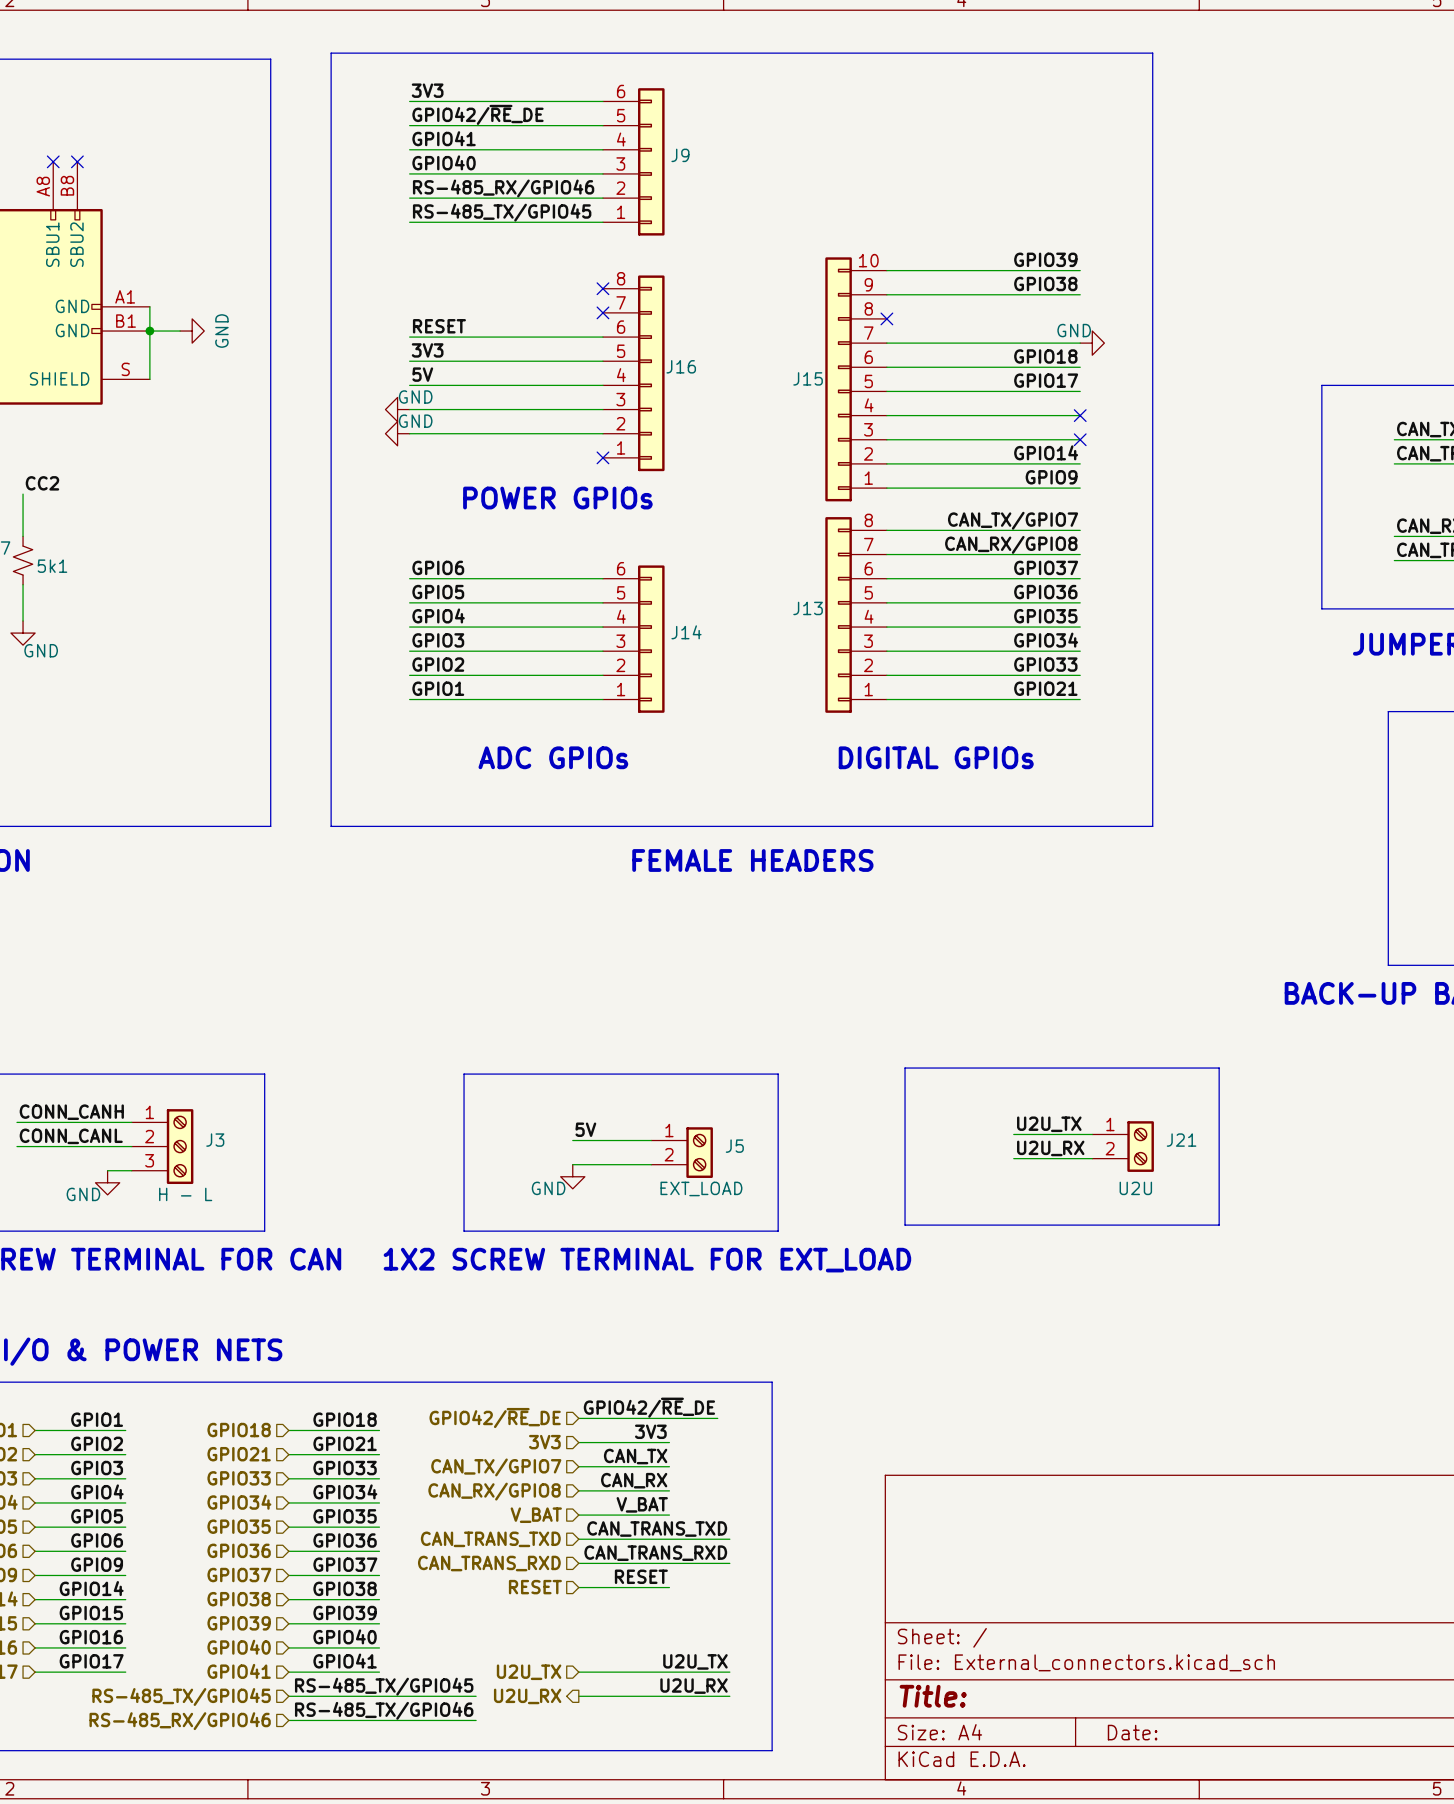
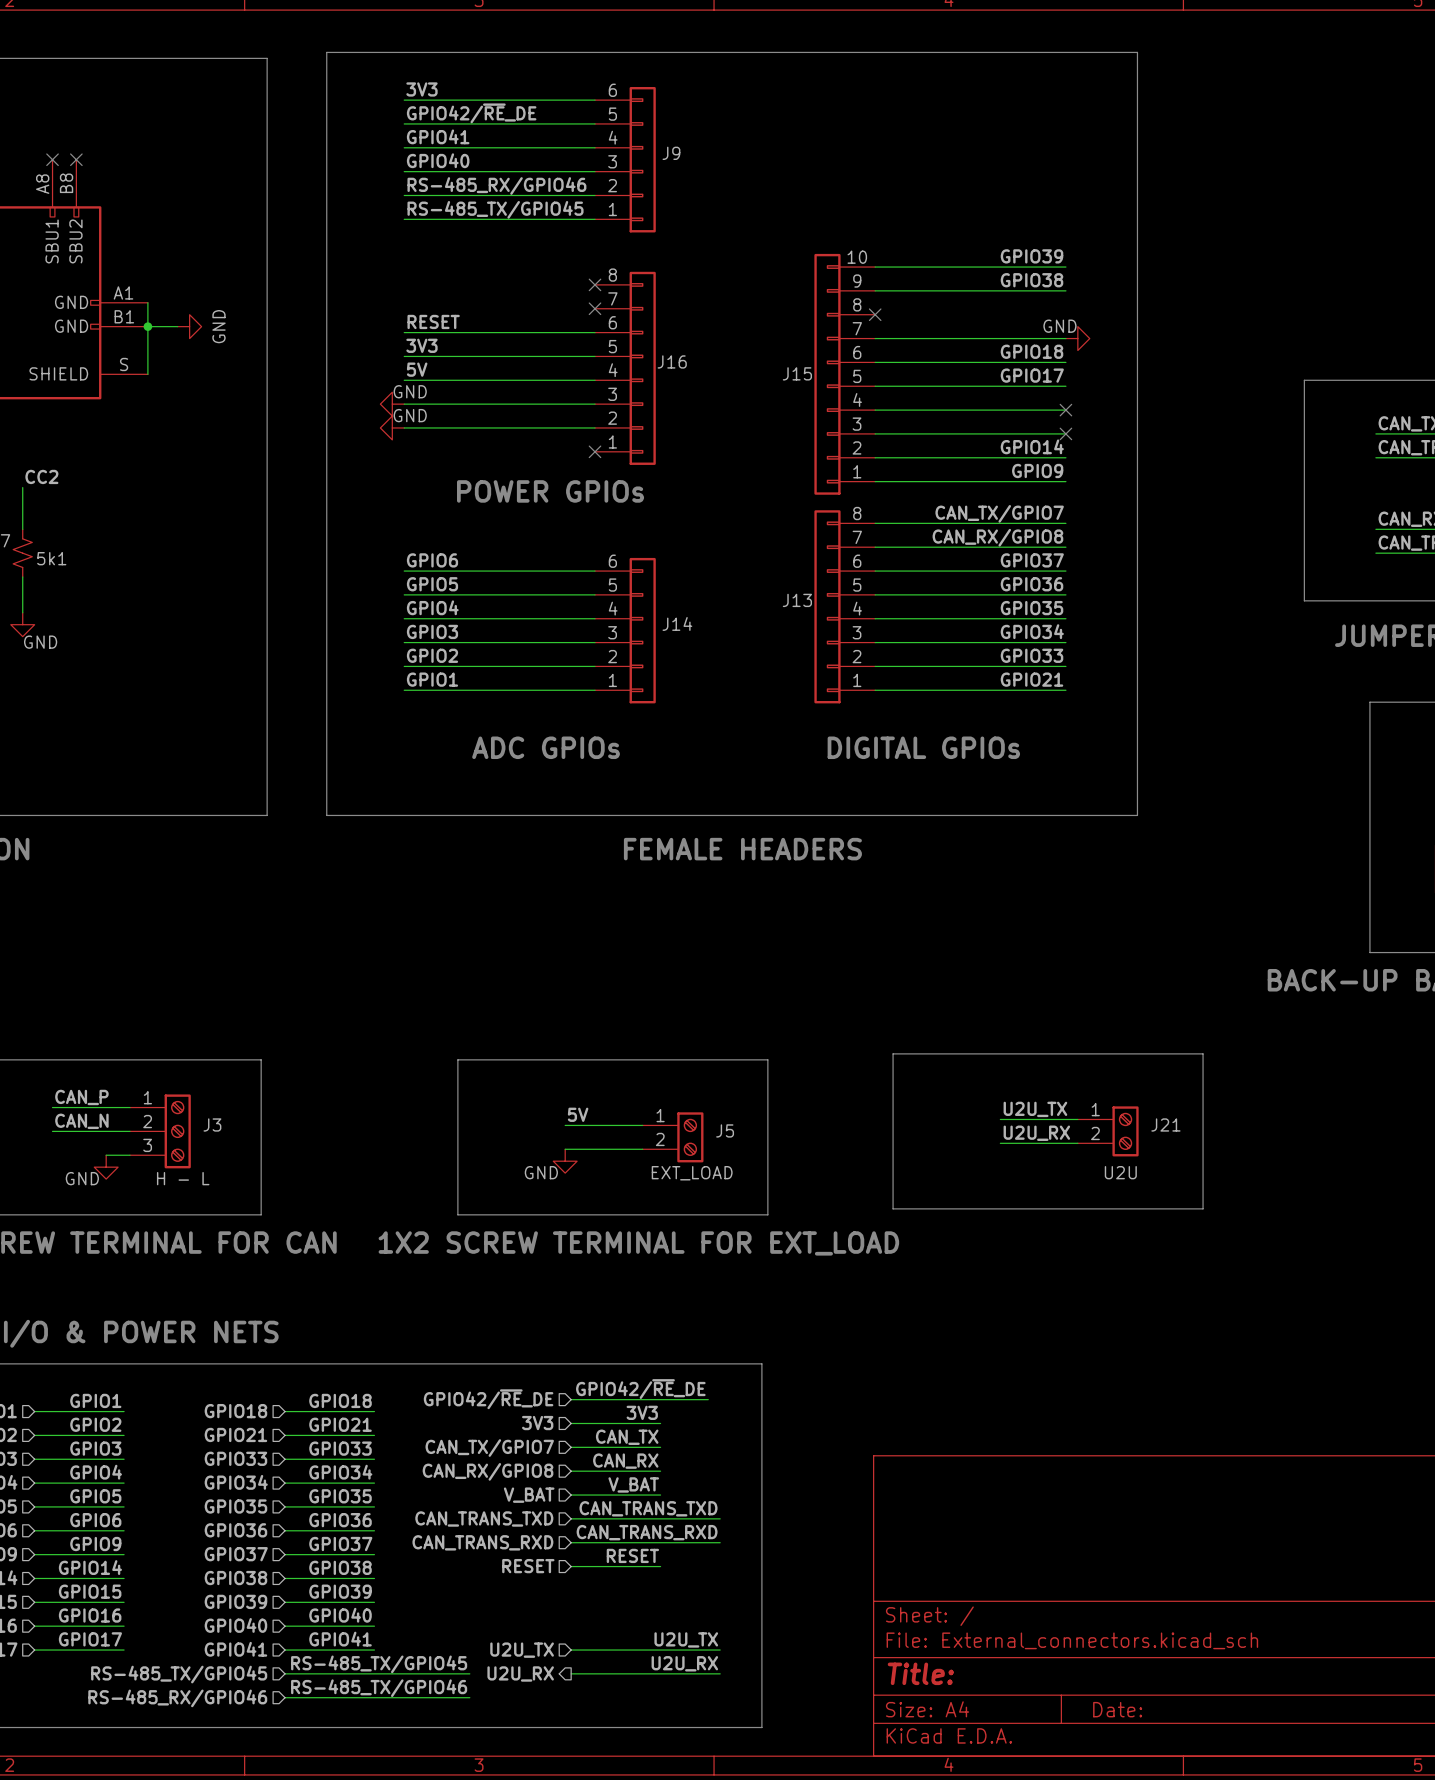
label: CONN_CANH (71, 1112) -> none
label: none -> CAN_P (81, 1097)
wire: (16, 1122) (53, 1122) -> none
label: CONN_CANL (71, 1136) -> none
label: none -> CAN_N (81, 1121)
wire: (16, 1146) (53, 1146) -> none

